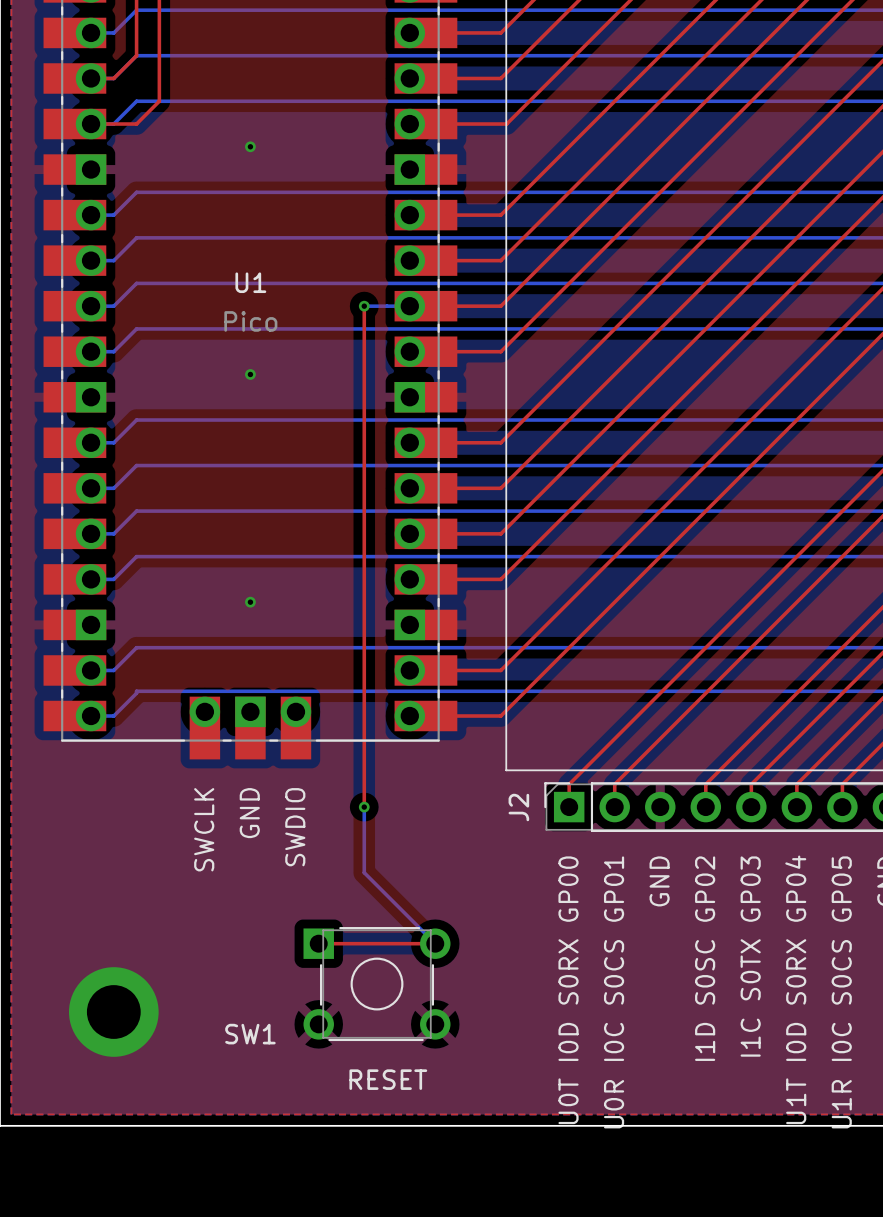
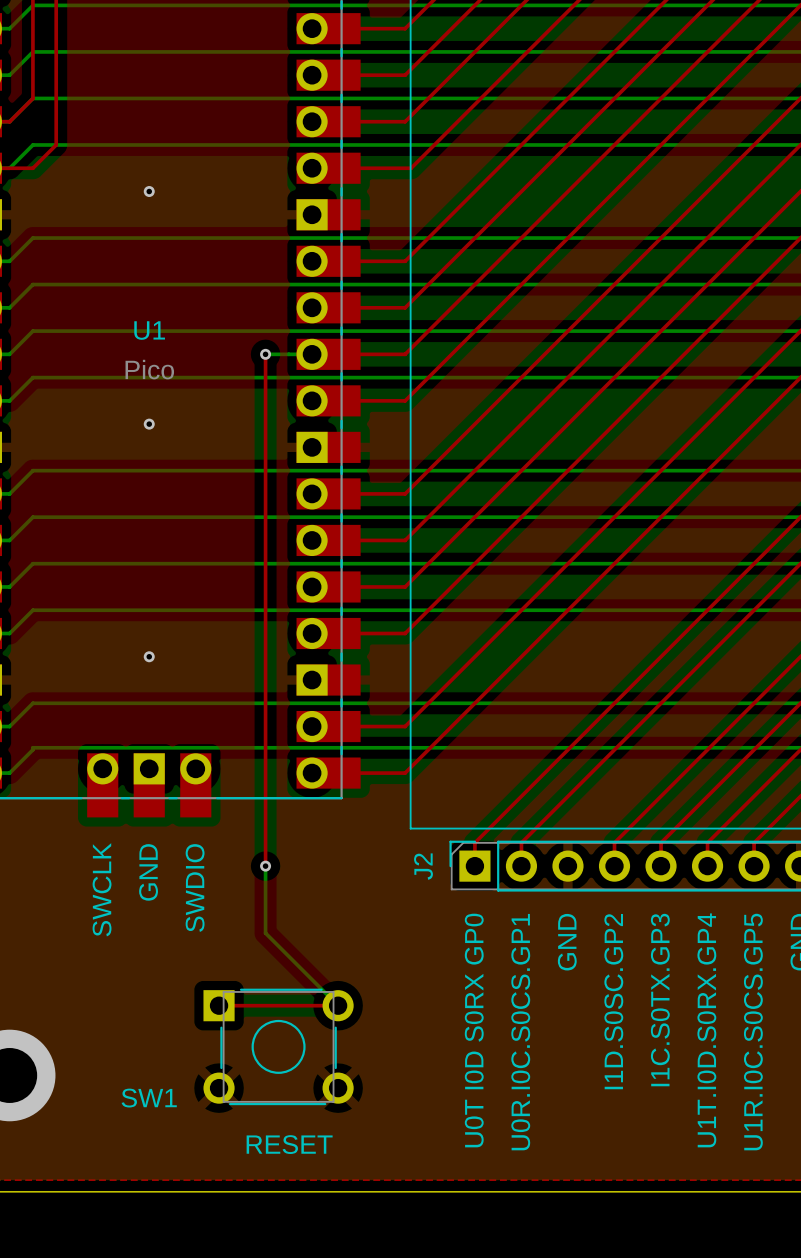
text: I1C S0TX GP03 (750, 956) -> I1C.S0TX.GP3 (660, 1000)
text: I1D S0SC GP02 (705, 958) -> I1D.S0SC.GP2 (613, 1001)
text: U1T I0D S0RX GP04 (795, 989) -> U1T.I0D.S0RX.GP4 (706, 1030)
text: U0T I0D S0RX GP00 (568, 990) -> U0T I0D S0RX GP0 (474, 1030)
text: U0R I0C S0CS GP01 (614, 992) -> U0R.I0C.S0CS.GP1 (520, 1032)
text: U1R I0C S0CS GP05 (841, 992) -> U1R.I0C.S0CS.GP5 (753, 1032)

